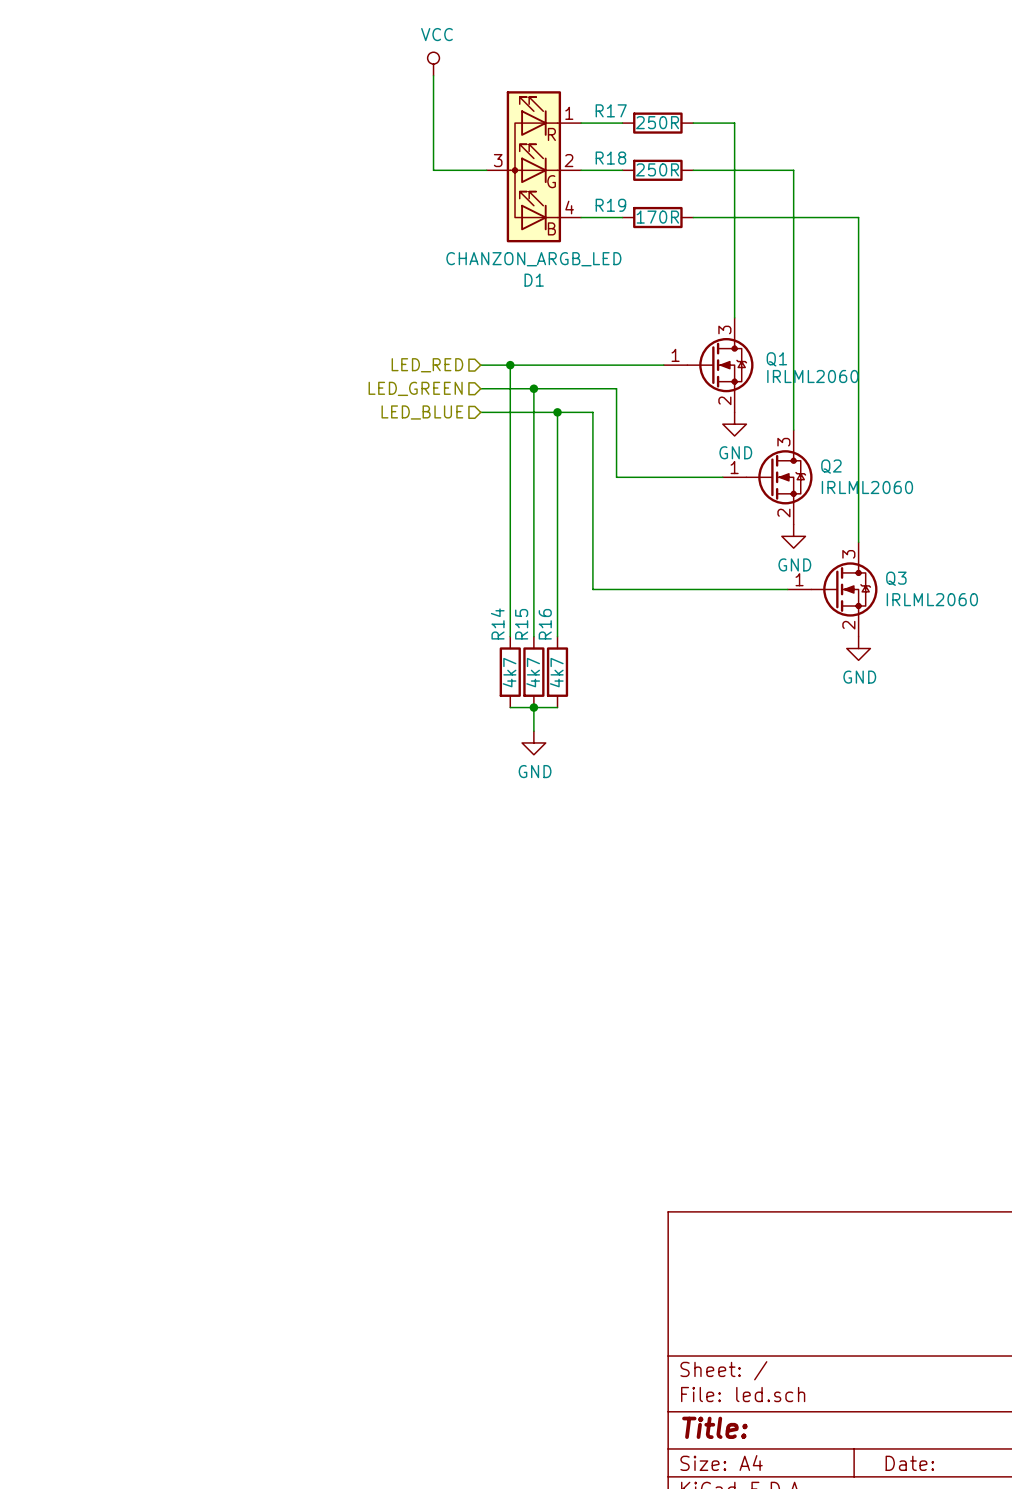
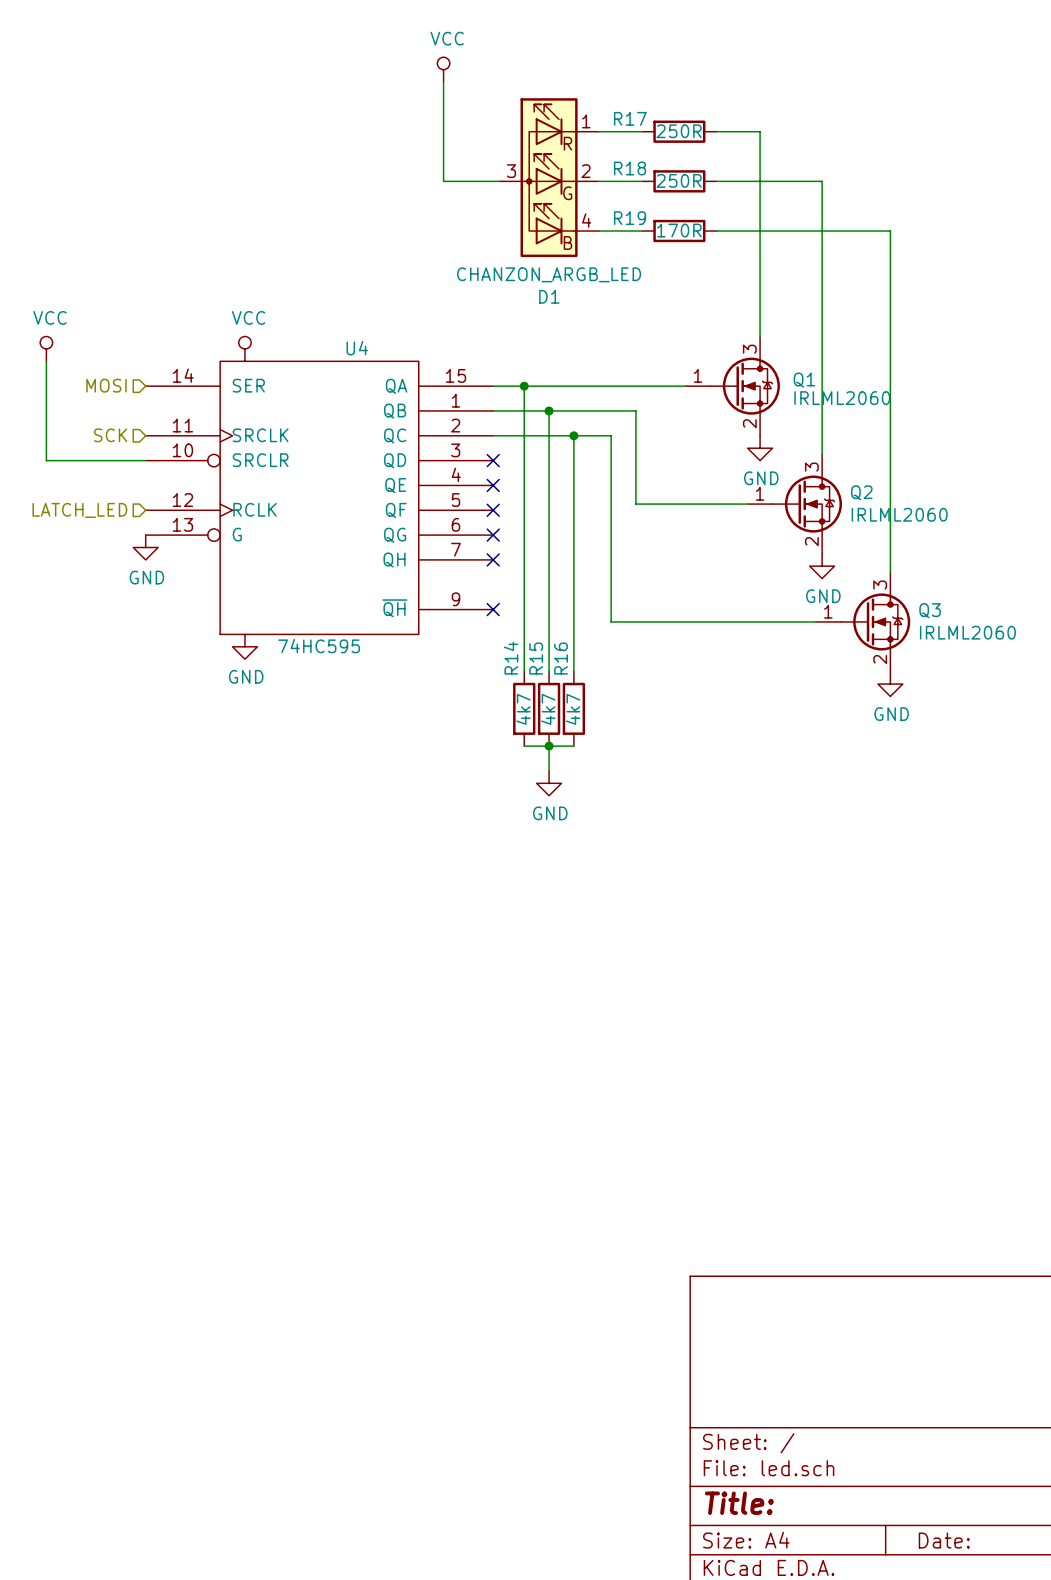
power symbol: none -> VCC (46, 348)
power symbol: none -> VCC (244, 348)
wire: none -> (46, 361) (46, 460) (145, 460)
hierarchical label: none -> MOSI (106, 385)
hierarchical label: LED_RED (427, 365) -> none
hierarchical label: LED_GREEN (415, 388) -> none
hierarchical label: none -> SCK (110, 435)
hierarchical label: LED_BLUE (422, 412) -> none
no-connect mark: none -> (493, 460)
no-connect mark: none -> (493, 485)
U4: none -> 74HC595 (319, 497)
hierarchical label: none -> LATCH_LED (79, 510)
no-connect mark: none -> (493, 510)
no-connect mark: none -> (493, 535)
power symbol: none -> GND (145, 547)
no-connect mark: none -> (493, 559)
no-connect mark: none -> (493, 609)
power symbol: none -> GND (244, 646)

